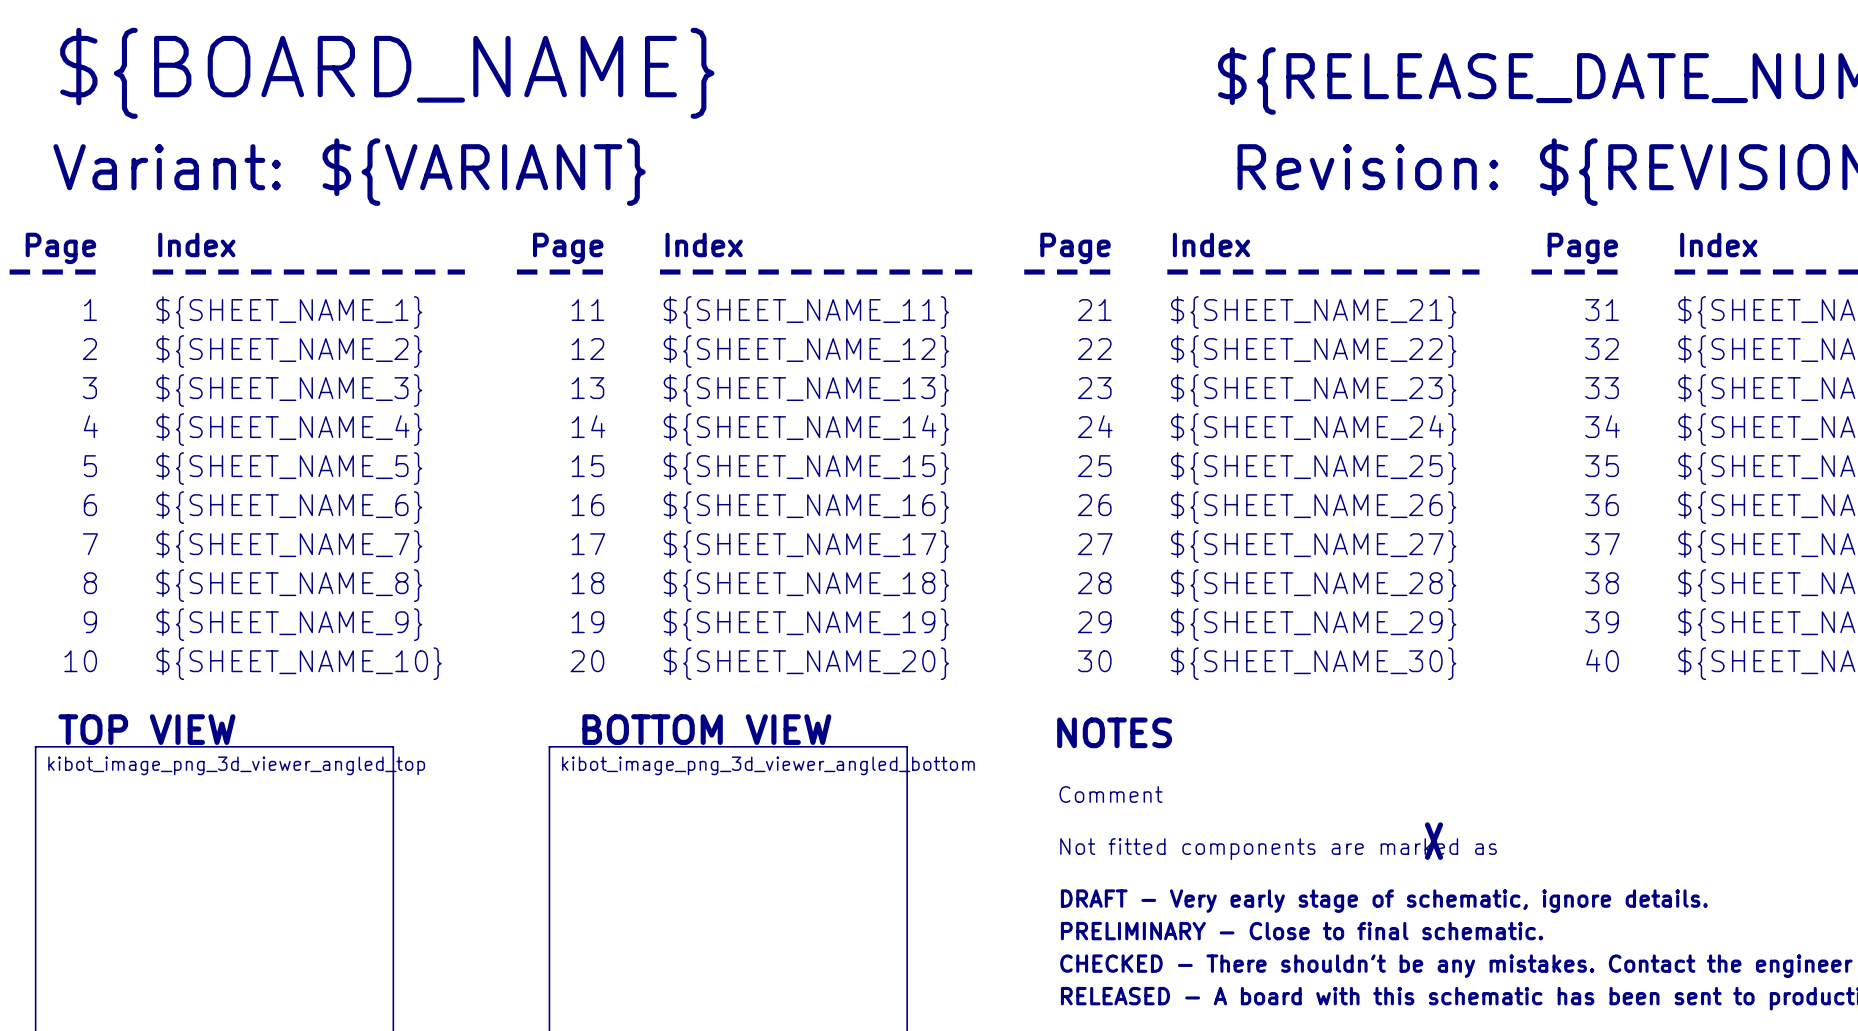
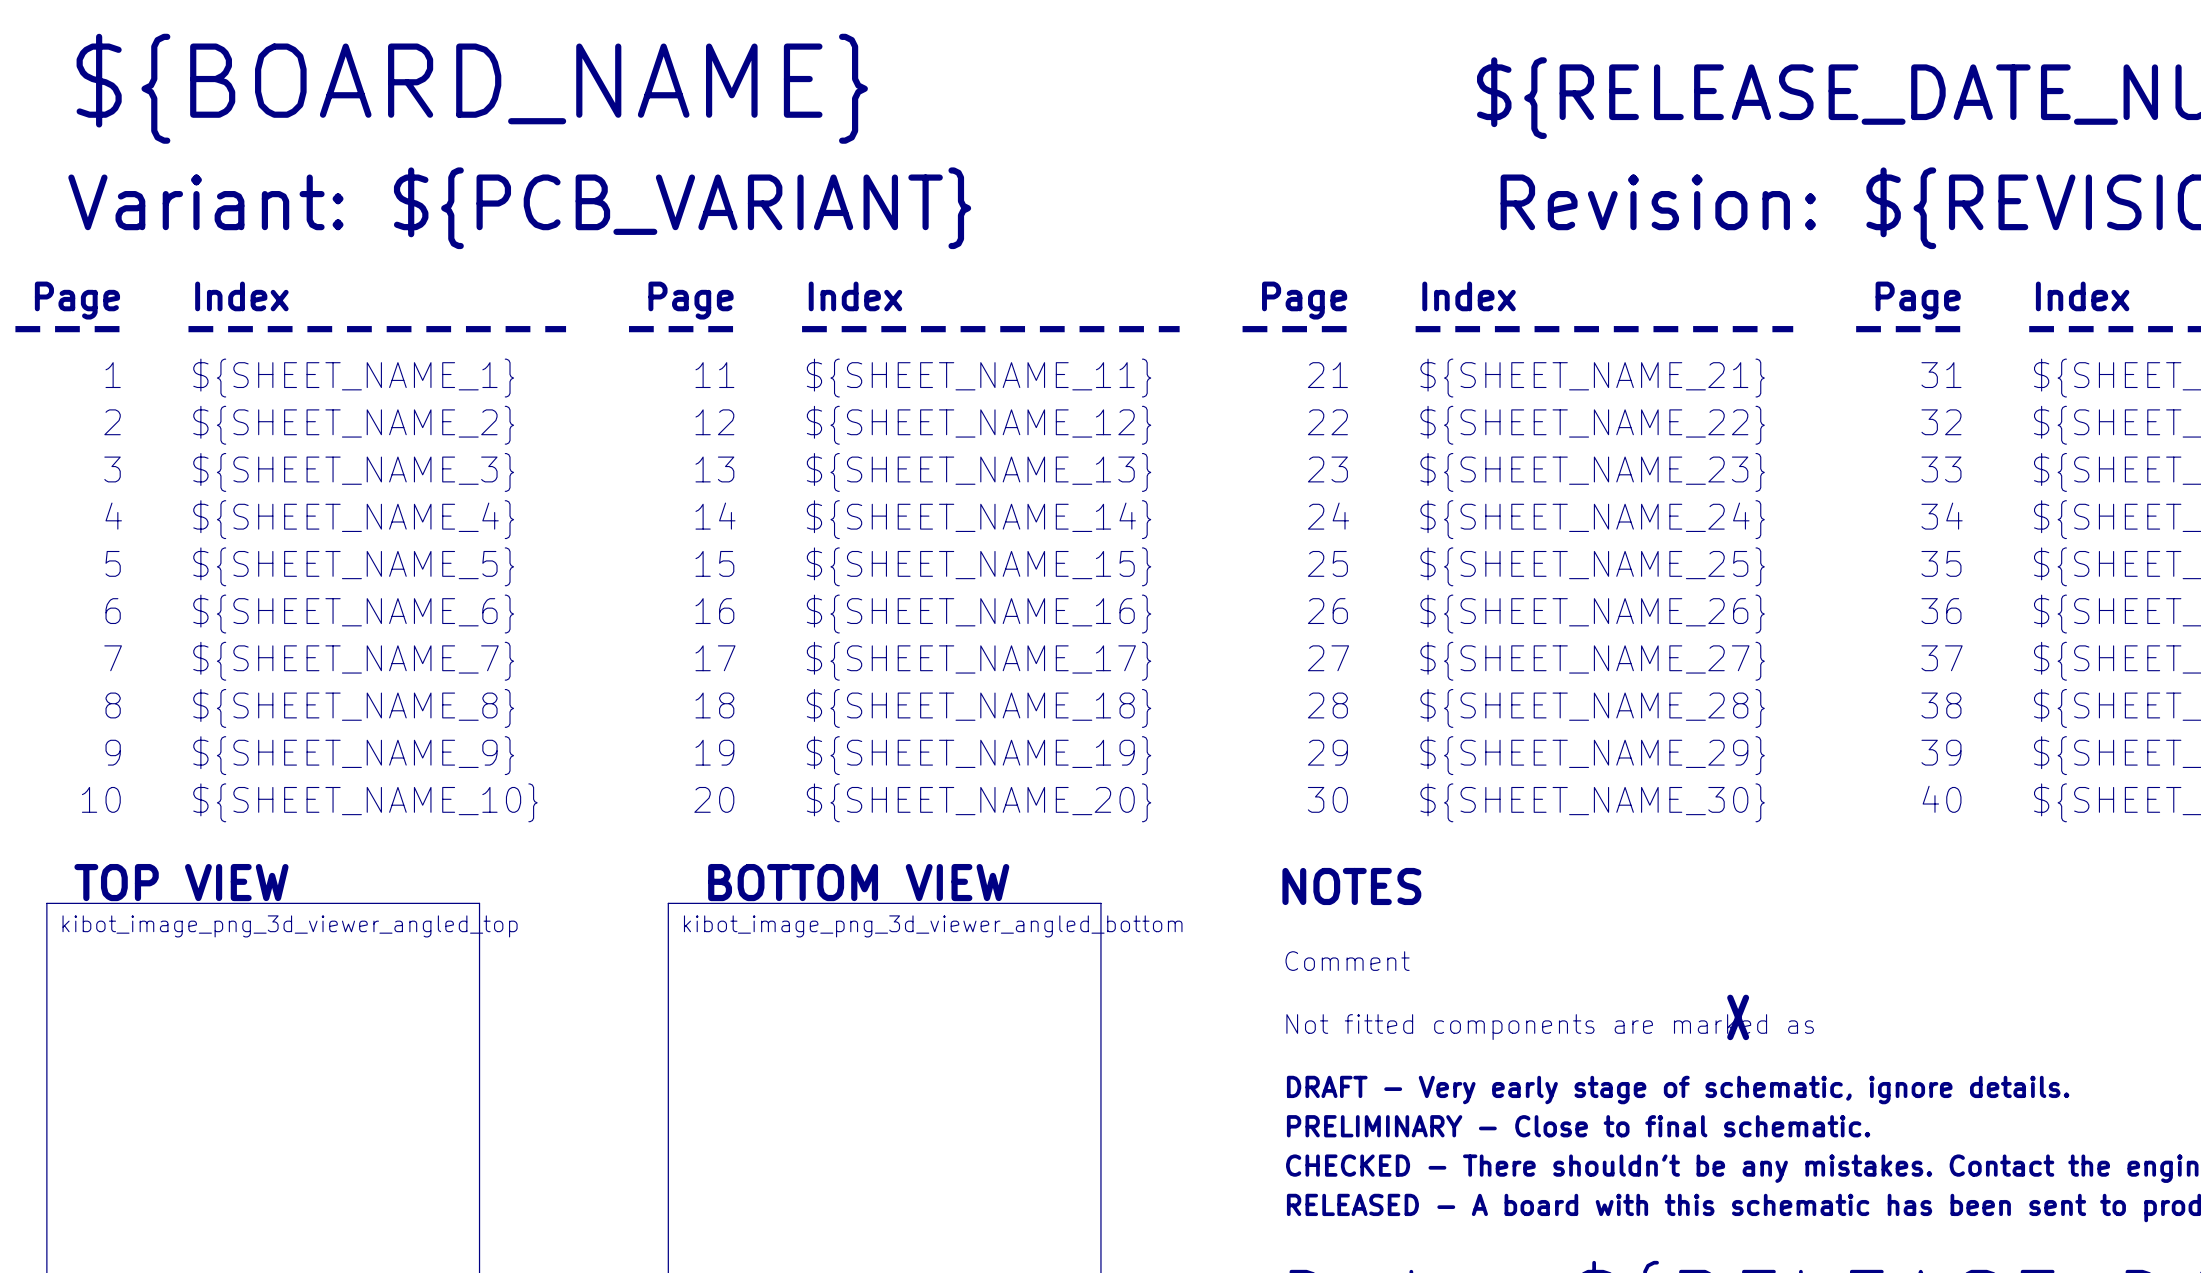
text: Variant: ${VARIANT} (349, 172) -> Variant: ${PCB_VARIANT} (519, 208)

